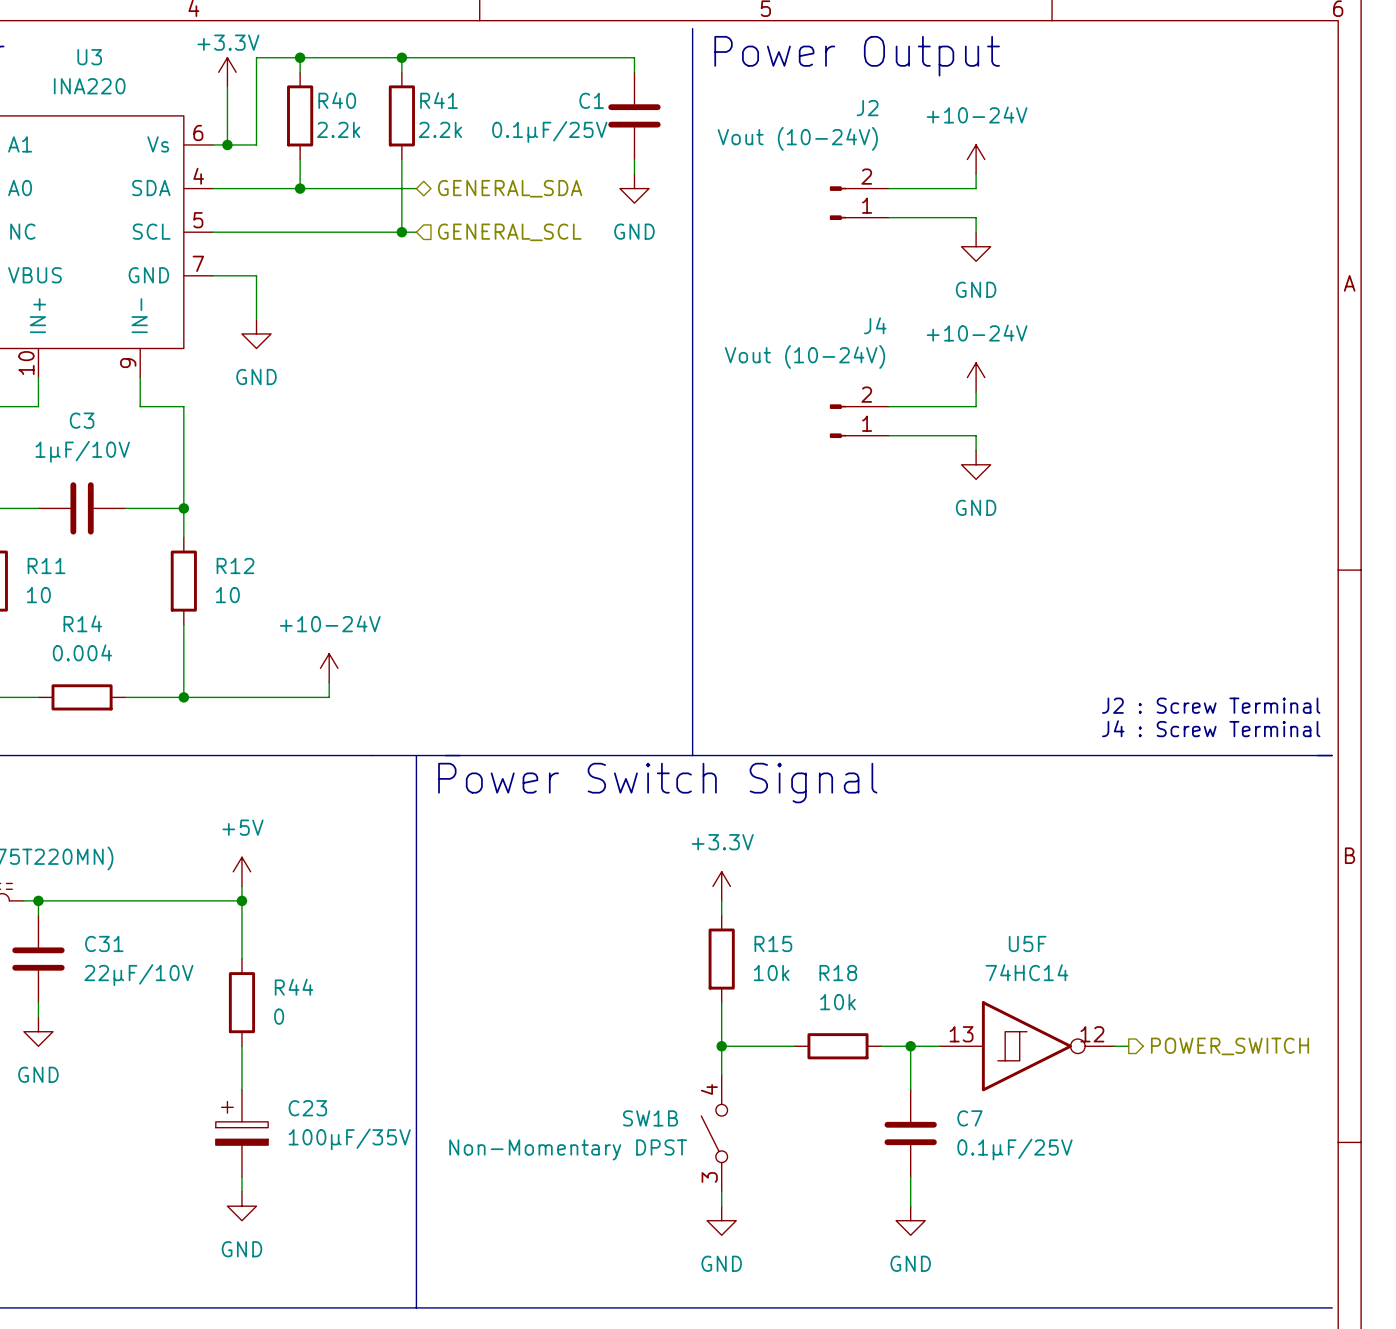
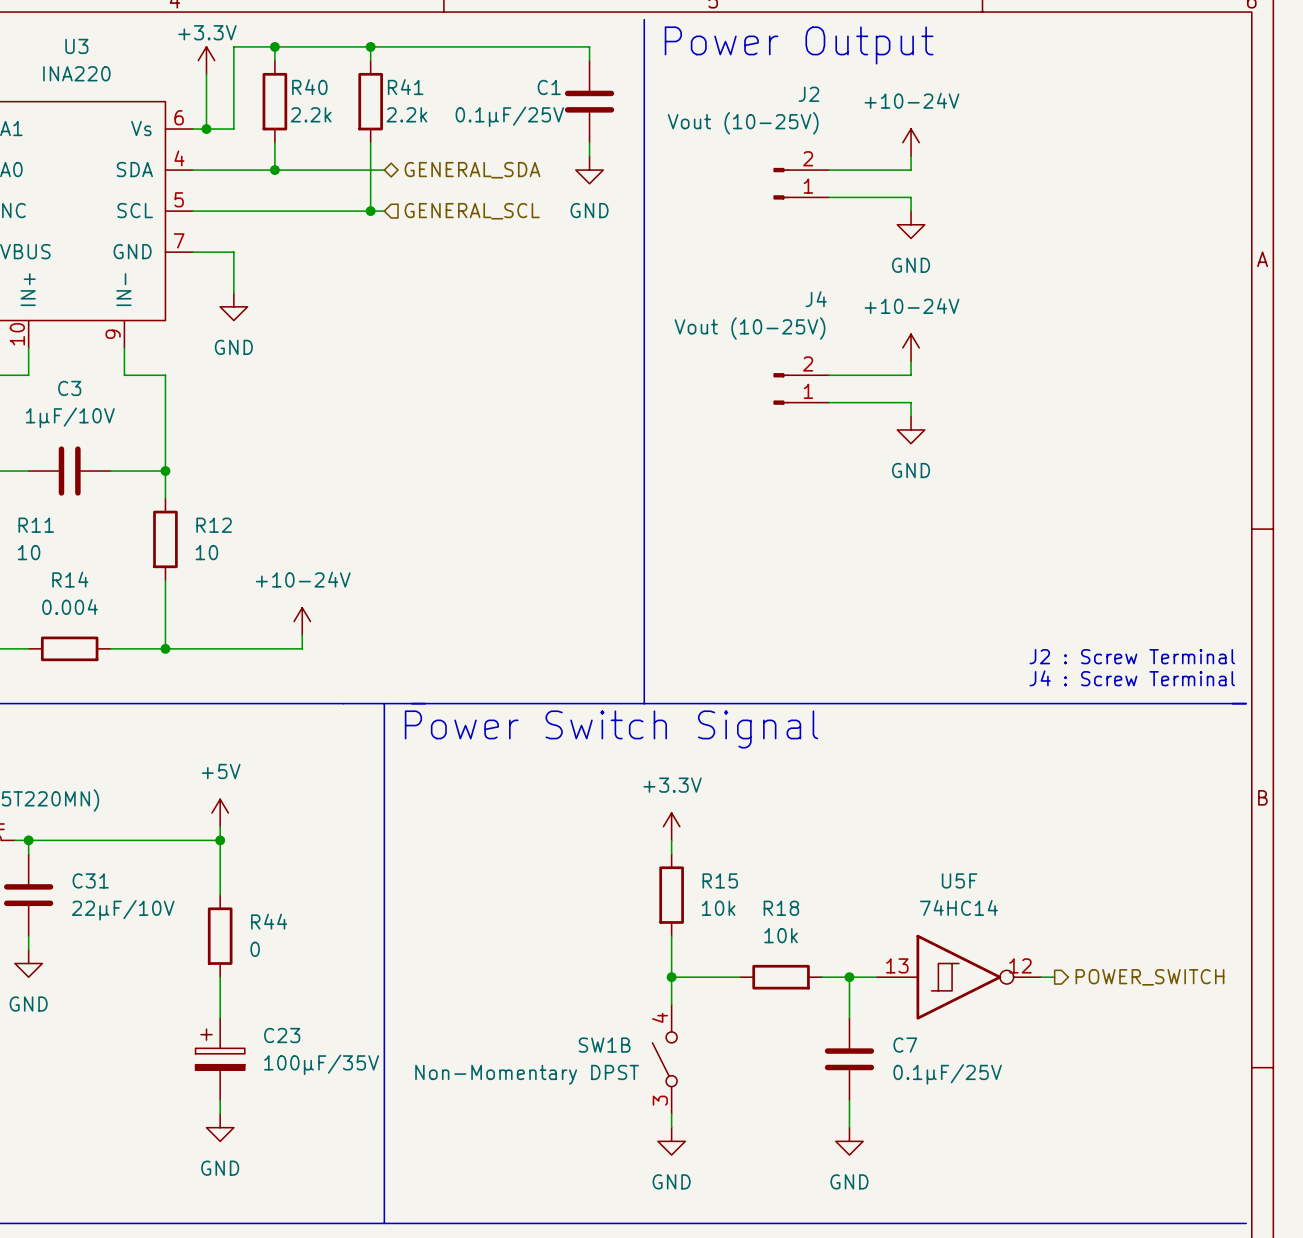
J2 value: Vout (10-24V) (797, 138) -> Vout (10-25V) (743, 123)
J4 value: Vout (10-24V) (805, 356) -> Vout (10-25V) (750, 328)

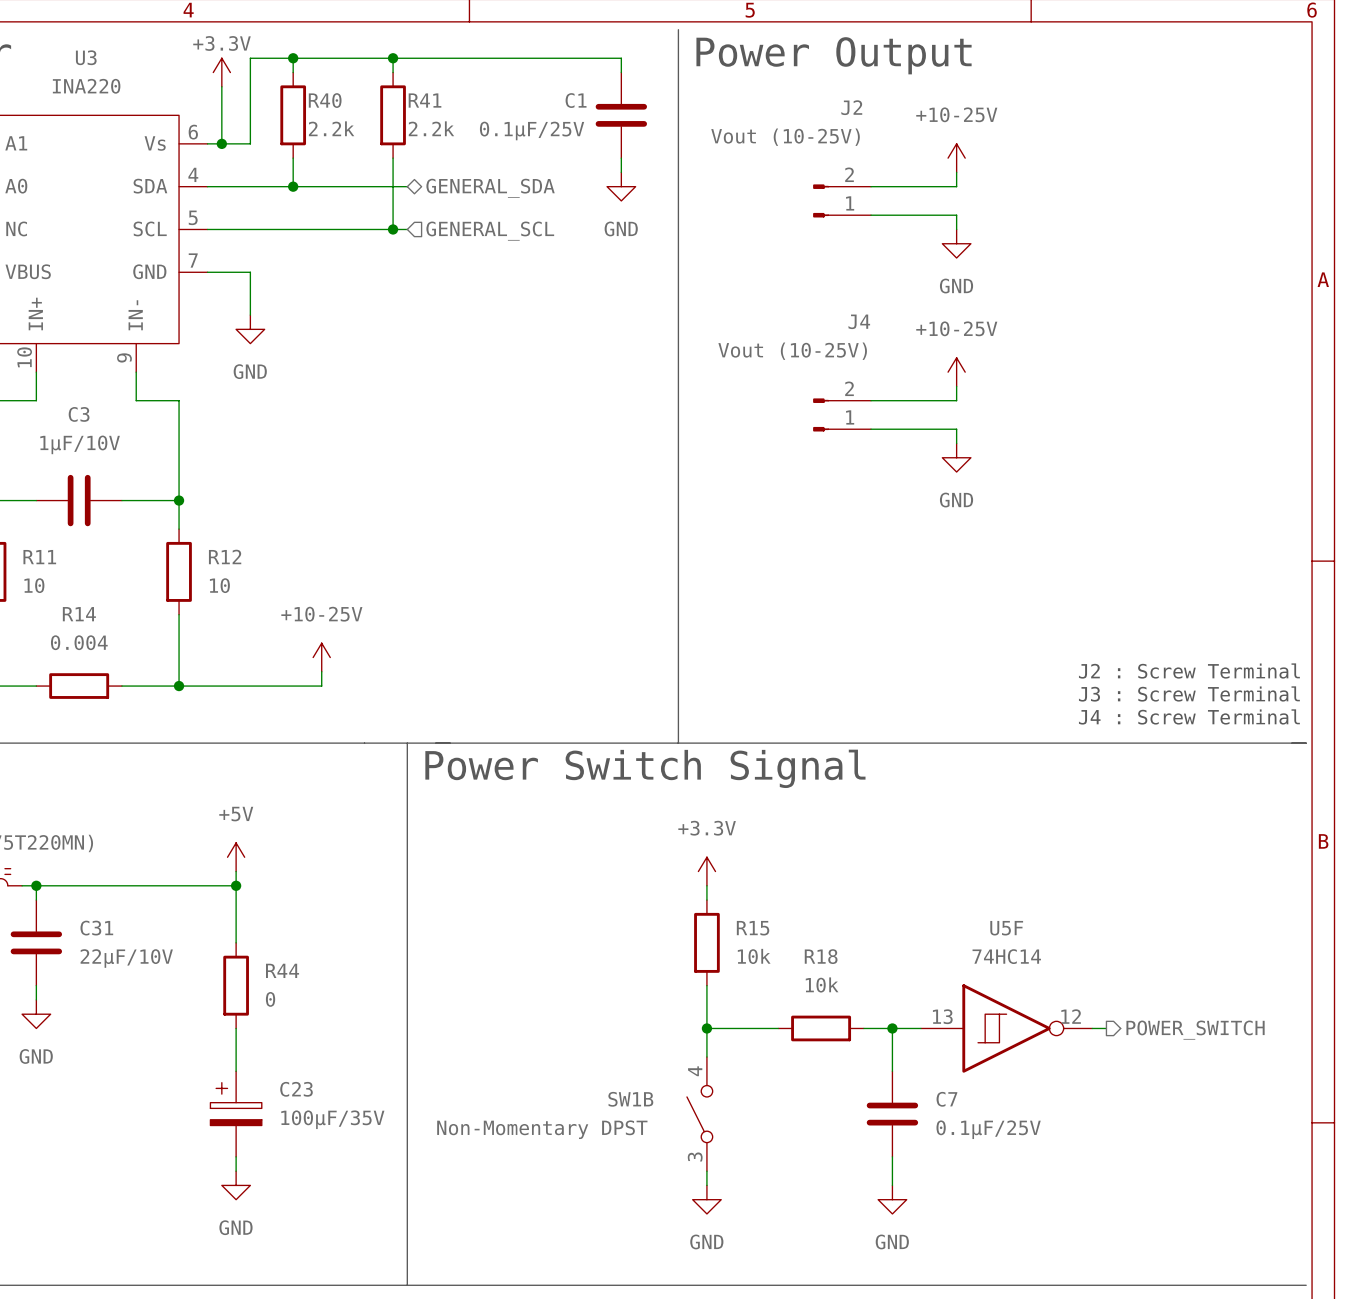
power symbol: +10-24V (911, 142) -> +10-25V (956, 158)
power symbol: +10-24V (911, 347) -> +10-25V (956, 372)
power symbol: +10-24V (302, 621) -> +10-25V (321, 657)
text: none -> J2 : Screw Terminal (1189, 671)
text: J2 : Screw Terminal (1132, 656) -> J3 : Screw Terminal (1189, 693)

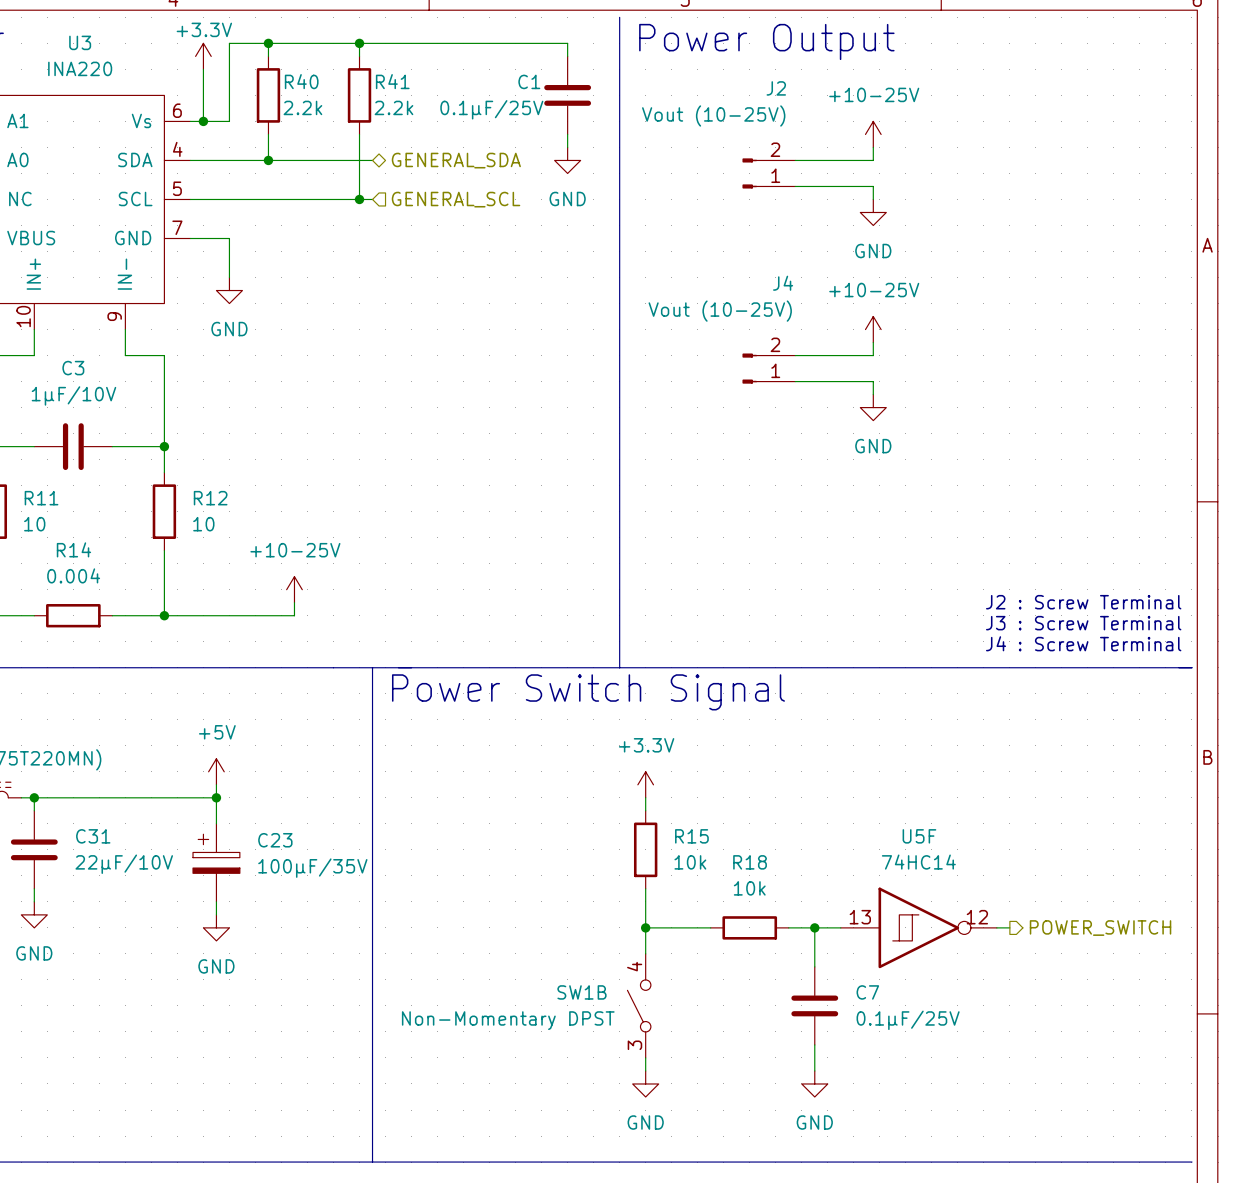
R44: 0 (236, 985) -> none
wire: (236, 1028) (236, 1071) -> none
C23 position: (236, 1114) -> (216, 862)
wire: (236, 1156) (236, 1171) -> (216, 901) (216, 914)
power symbol position: GND (236, 1185) -> GND (216, 927)

